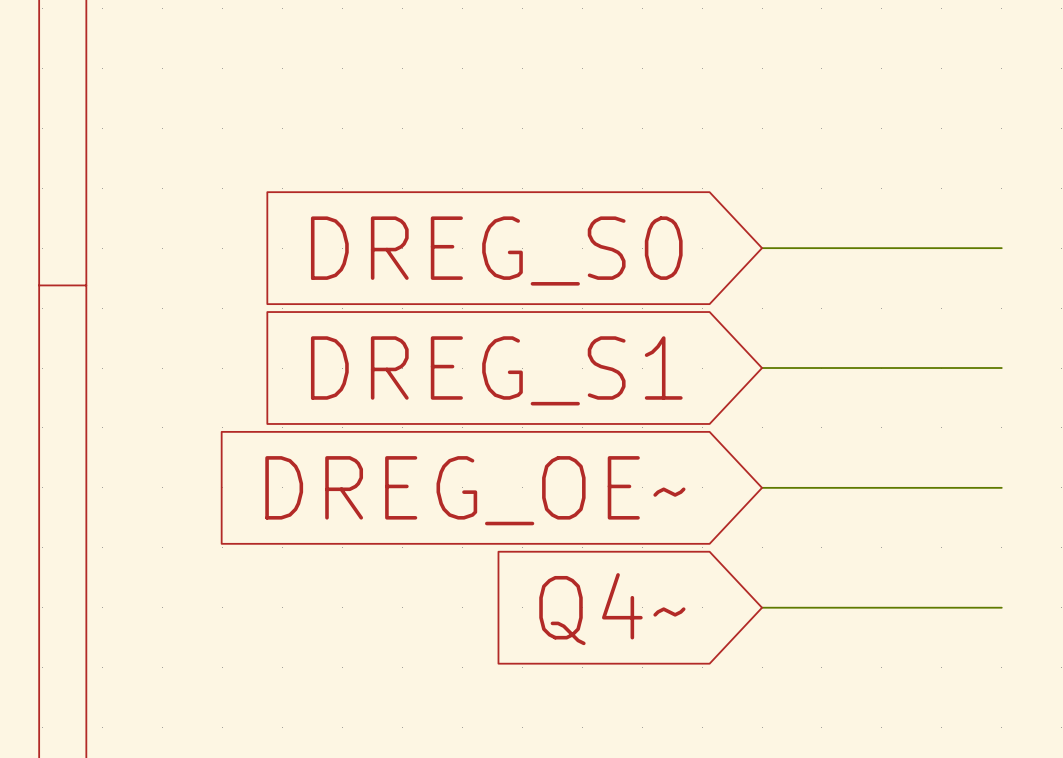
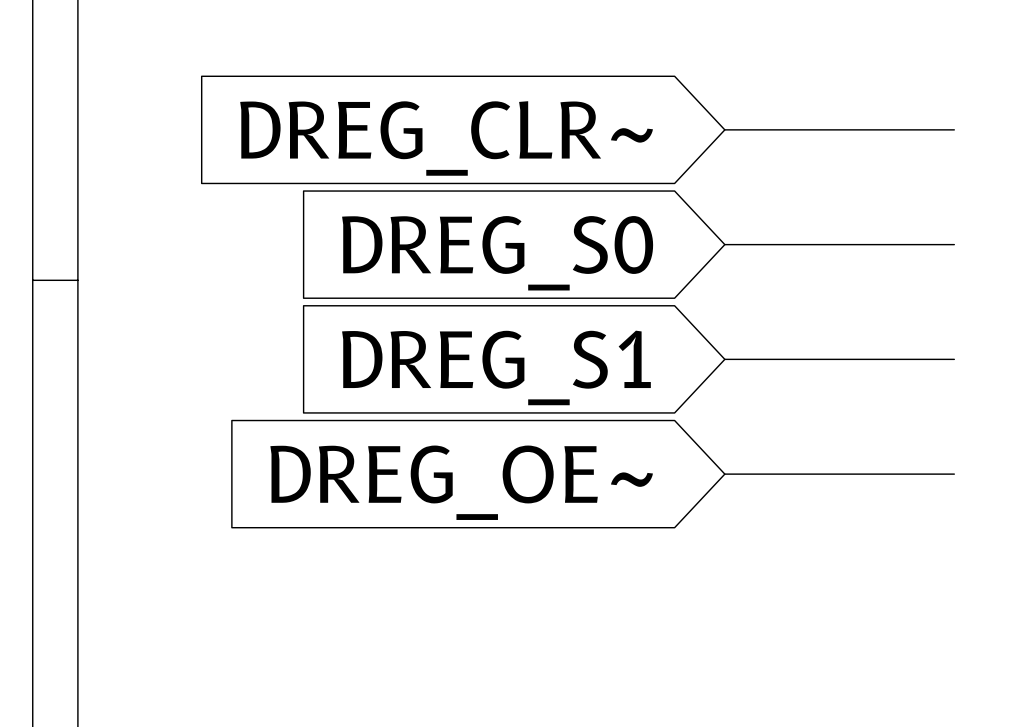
global label: none -> DREG_CLR~ (446, 138)
wire: (762, 607) (1001, 607) -> (724, 129) (954, 129)
global label: Q4~ (612, 609) -> none

